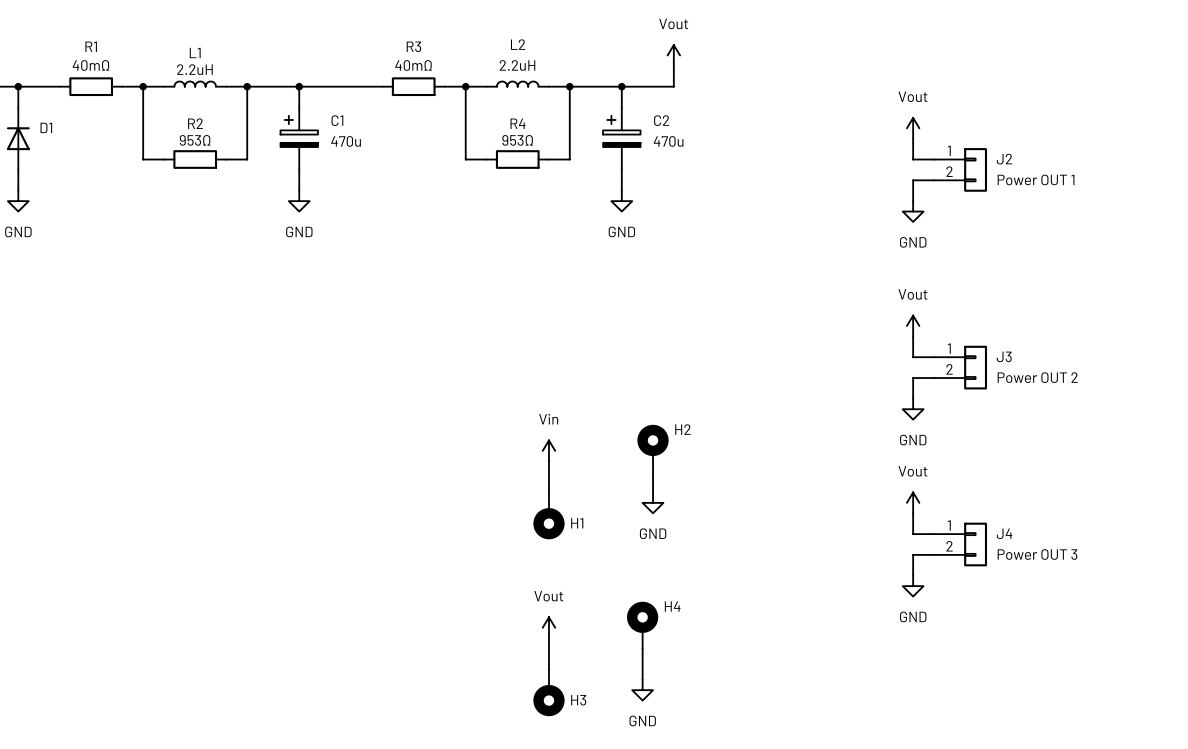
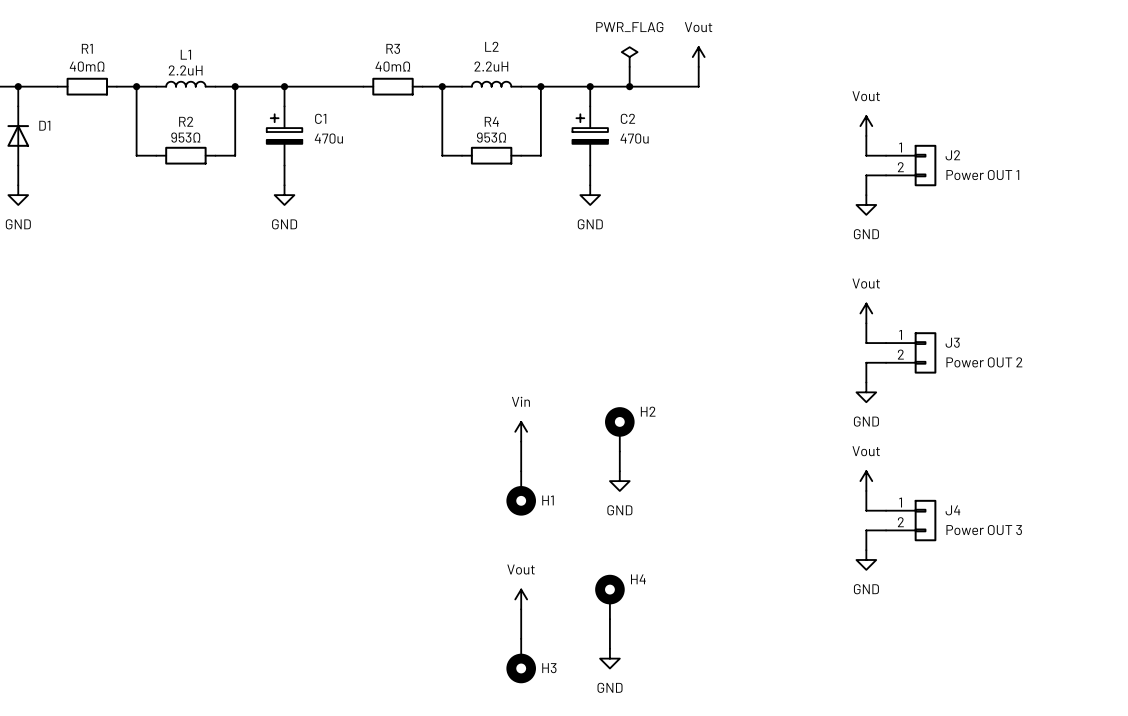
power symbol: none -> PWR_FLAG (629, 57)
power symbol position: Vout (673, 55) -> Vout (698, 57)
wire: none -> (629, 66) (629, 86)
wire: (673, 65) (673, 86) -> (698, 66) (698, 86) (639, 86)
junction: none -> (629, 86)

